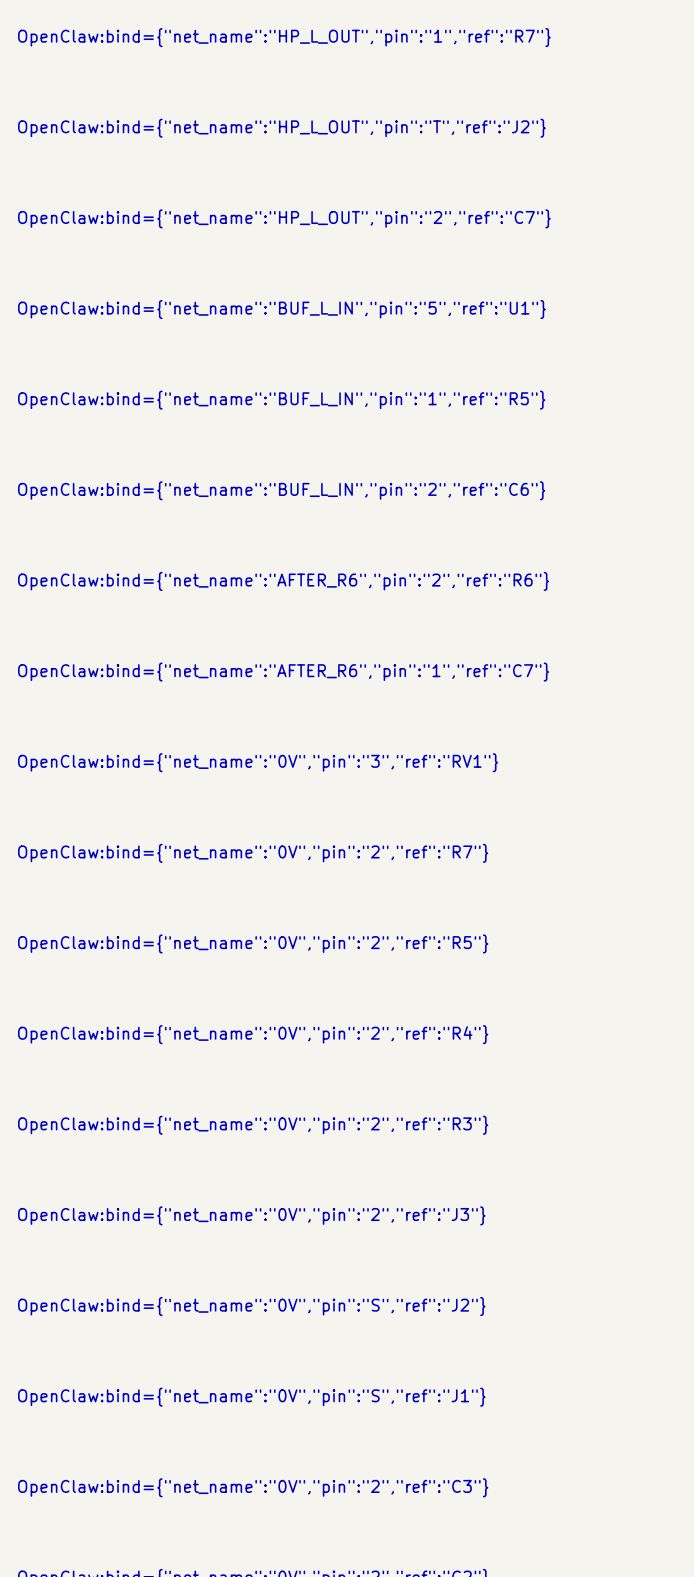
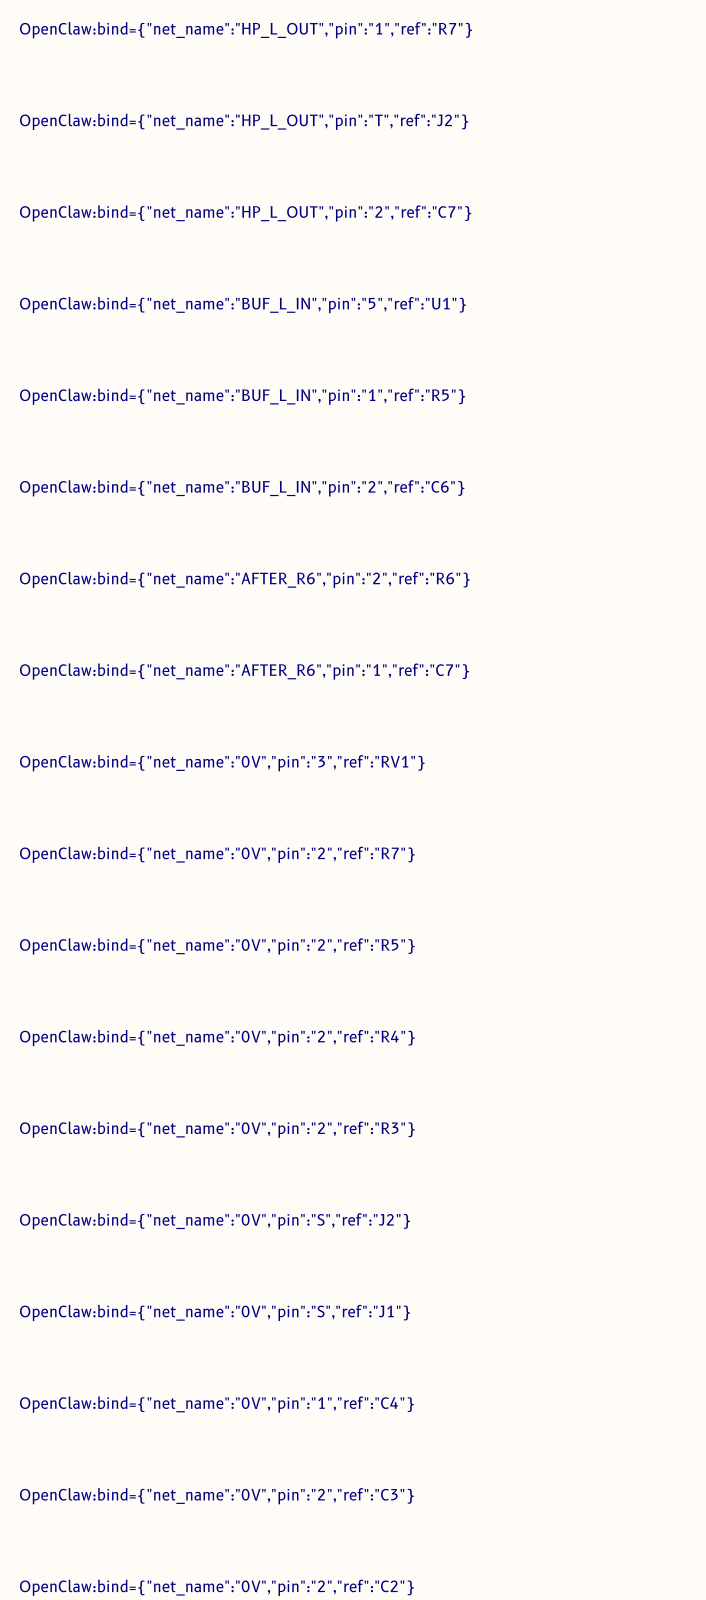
text: OpenClaw:bind={"net_name":"0V","pin":"2","ref":"J3"} (251, 1215) -> OpenClaw:bind={"net_name":"0V","pin":"S","ref":"J2"} (215, 1221)
text: OpenClaw:bind={"net_name":"0V","pin":"S","ref":"J2"} (251, 1306) -> OpenClaw:bind={"net_name":"0V","pin":"S","ref":"J1"} (215, 1312)
text: OpenClaw:bind={"net_name":"0V","pin":"S","ref":"J1"} (251, 1397) -> OpenClaw:bind={"net_name":"0V","pin":"1","ref":"C4"} (216, 1404)

